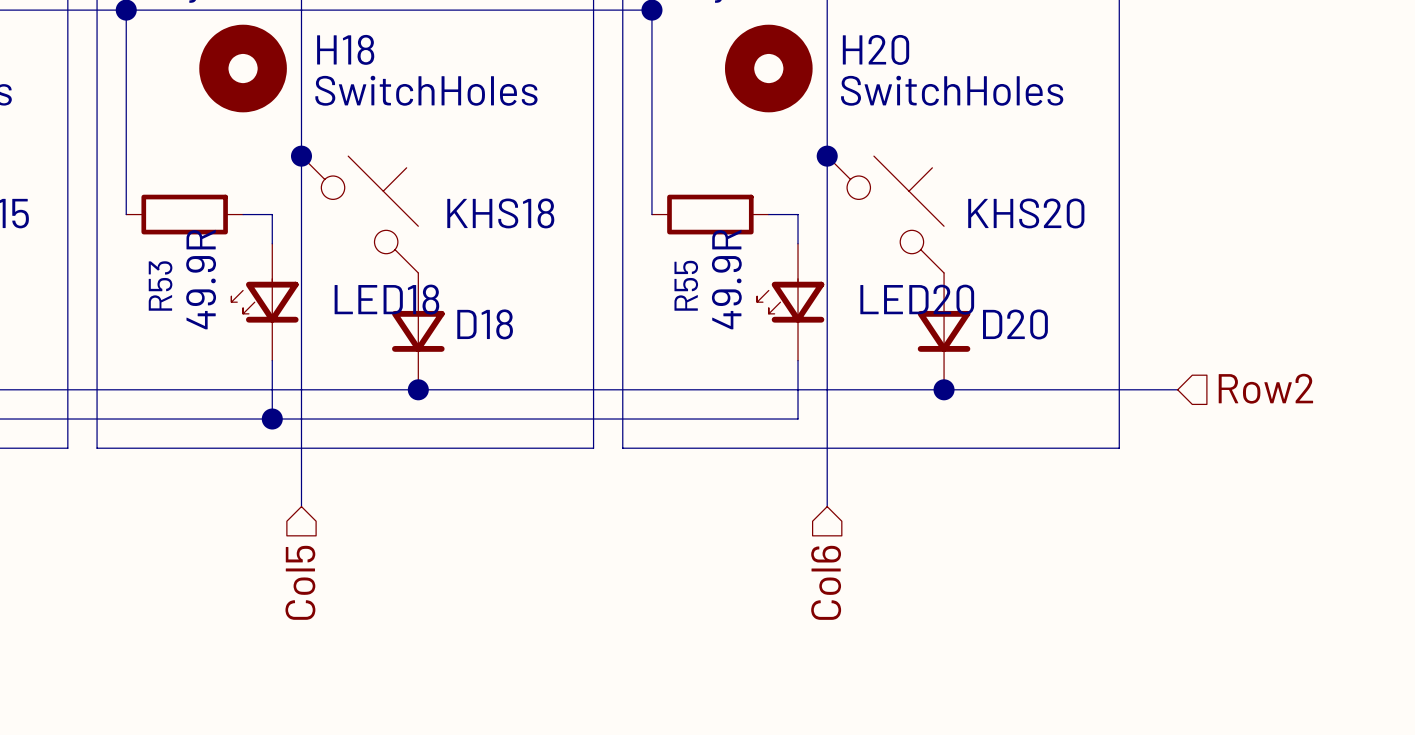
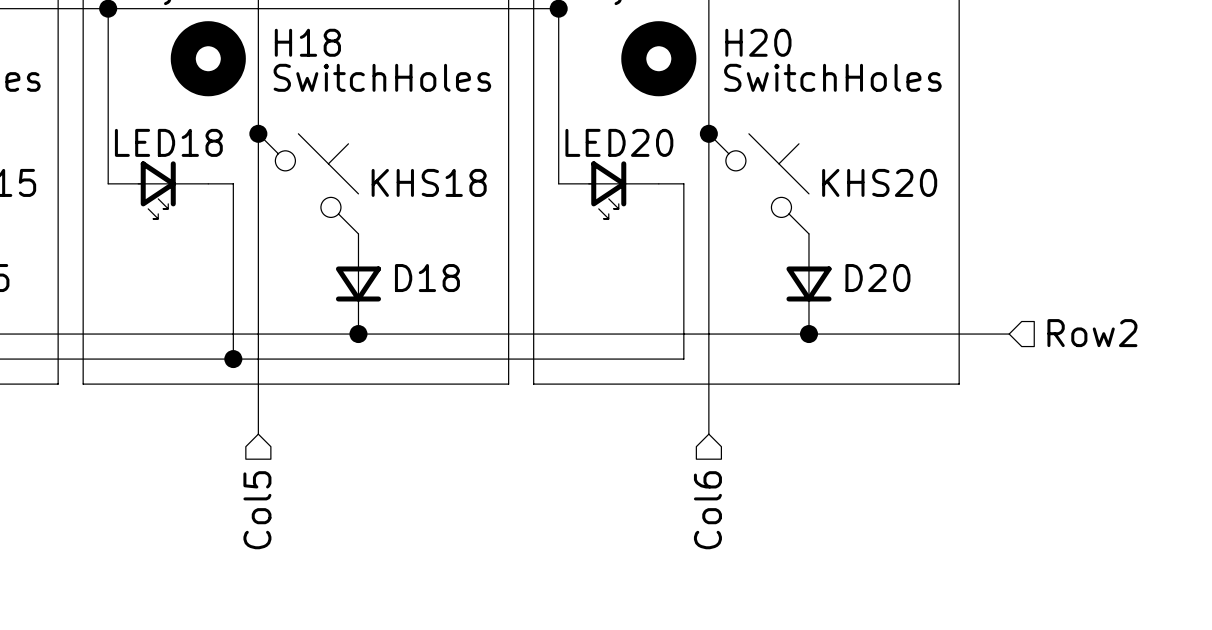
R53: 49.9R (184, 214) -> none
R55: 49.9R (710, 214) -> none
LED18 name position: LED18 (386, 299) -> LED18 (168, 142)
LED20 name position: LED20 (917, 299) -> LED20 (619, 142)
LED18 rotation: 0° (264, 300) -> 90° counterclockwise (156, 190)
LED20 rotation: 0° (790, 300) -> 90° counterclockwise (607, 190)
LED18 position: (264, 302) -> (158, 190)
LED20 position: (790, 302) -> (608, 190)

